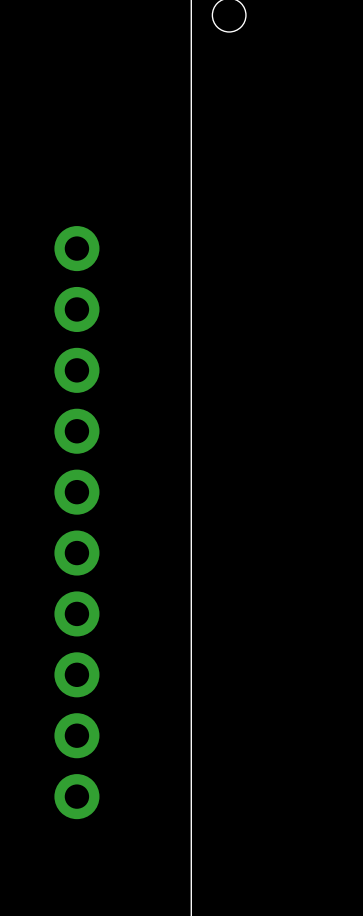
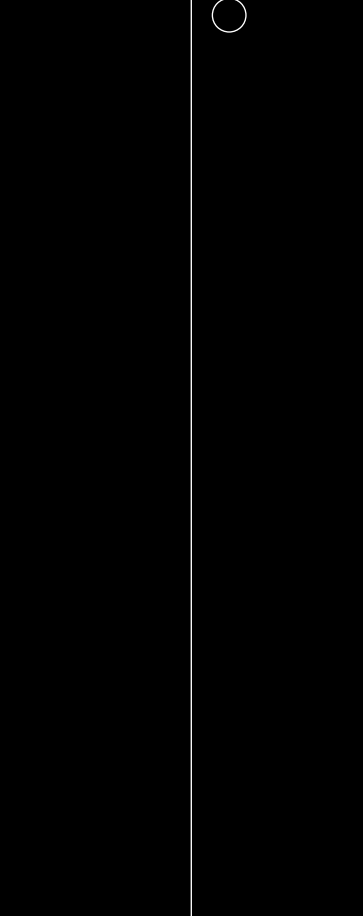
part: (76, 522) -> none

